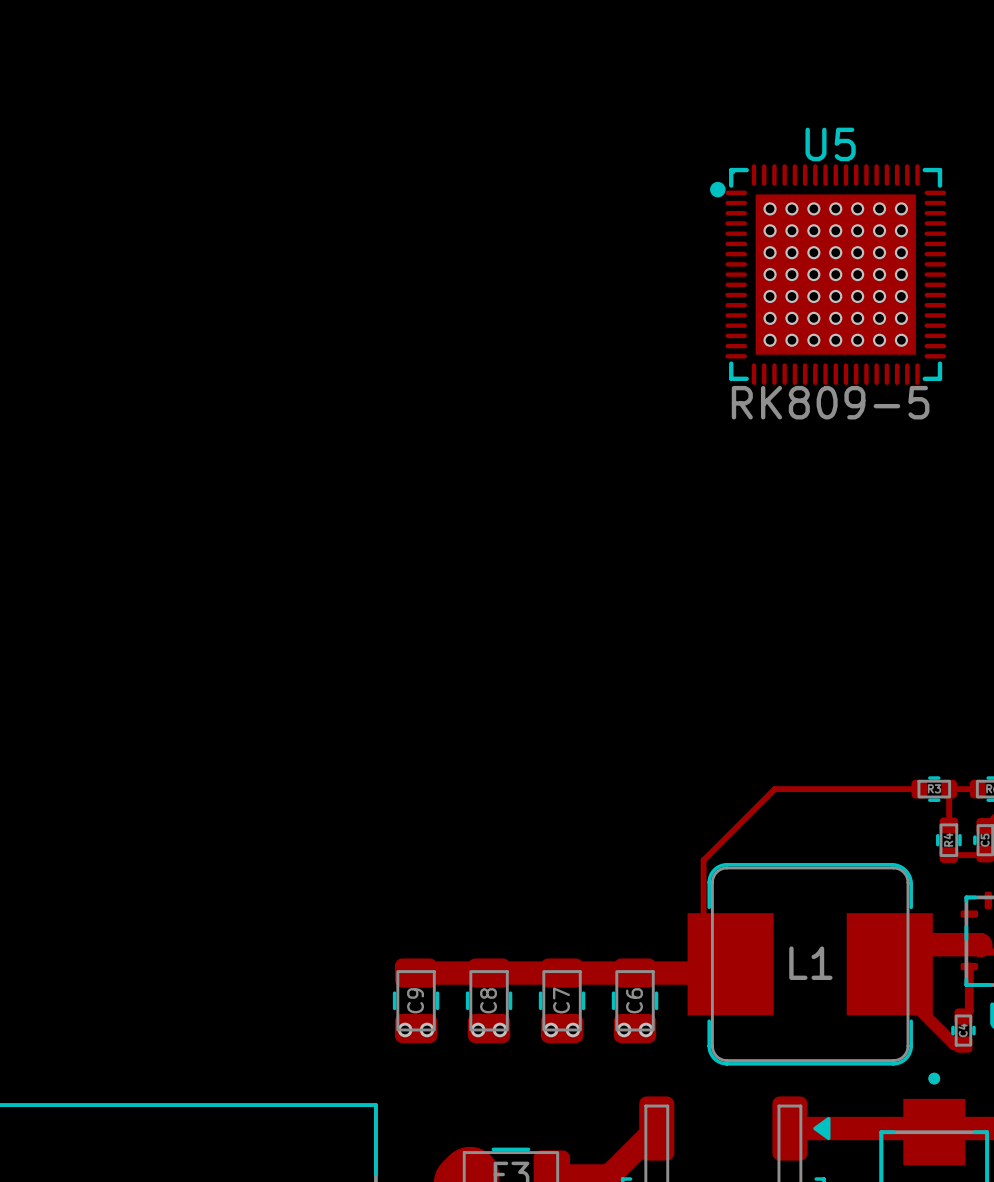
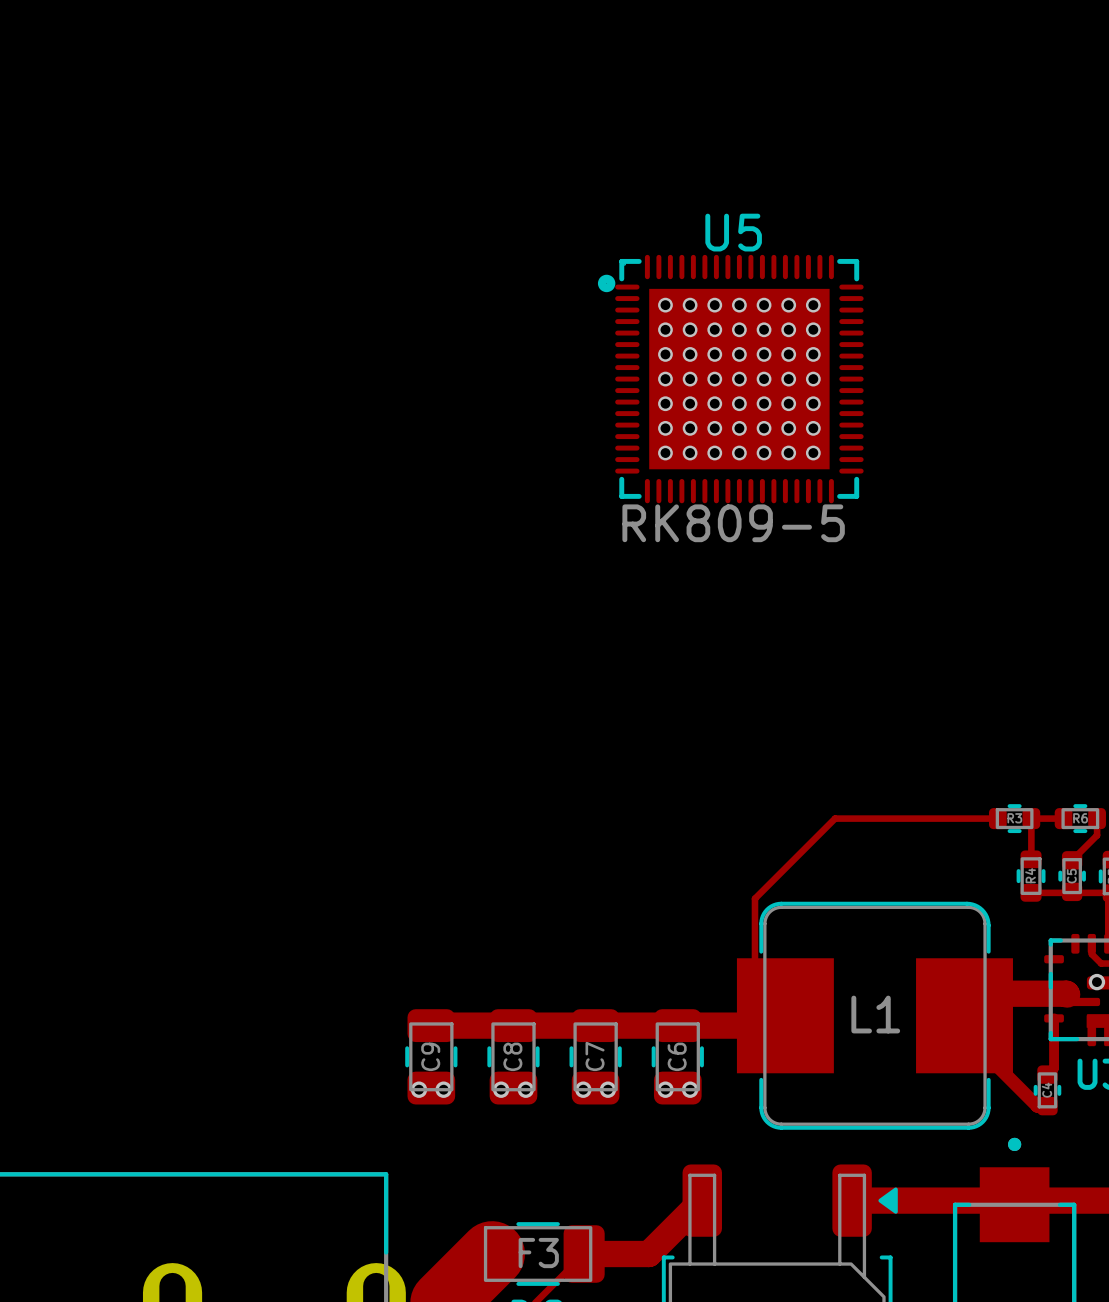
via: (770, 208) -> none
via: (791, 208) -> none
via: (813, 208) -> none
via: (835, 208) -> none
via: (857, 208) -> none
via: (879, 208) -> none
via: (901, 208) -> none
via: (770, 230) -> none
via: (791, 230) -> none
via: (813, 230) -> none
via: (835, 230) -> none
via: (857, 230) -> none
via: (879, 230) -> none
via: (901, 230) -> none
via: (770, 252) -> none
via: (791, 252) -> none
via: (813, 252) -> none
via: (835, 252) -> none
via: (857, 252) -> none
via: (879, 252) -> none
via: (901, 252) -> none
via: (770, 274) -> none
via: (791, 274) -> none
via: (813, 274) -> none
U5 position: (828, 274) -> (730, 379)
via: (835, 274) -> none
via: (857, 274) -> none
via: (879, 274) -> none
via: (901, 274) -> none
via: (770, 296) -> none
via: (791, 296) -> none
via: (813, 296) -> none
via: (835, 296) -> none
via: (857, 296) -> none
via: (879, 296) -> none
via: (901, 296) -> none
via: (770, 318) -> none
via: (791, 318) -> none
via: (813, 318) -> none
via: (835, 318) -> none
via: (857, 318) -> none
via: (879, 318) -> none
via: (901, 318) -> none
via: none -> (665, 305)
via: none -> (690, 305)
via: none -> (714, 305)
via: none -> (739, 305)
via: none -> (764, 305)
via: none -> (788, 305)
via: none -> (813, 305)
via: (770, 340) -> none
via: (791, 340) -> none
via: (813, 340) -> none
via: (835, 340) -> none
via: (857, 340) -> none
via: (879, 340) -> none
via: (901, 340) -> none
via: none -> (665, 329)
via: none -> (690, 329)
via: none -> (714, 329)
via: none -> (739, 329)
via: none -> (764, 329)
via: none -> (788, 329)
via: none -> (813, 329)
via: none -> (665, 354)
via: none -> (690, 354)
via: none -> (714, 354)
via: none -> (739, 354)
via: none -> (764, 354)
via: none -> (788, 354)
via: none -> (813, 354)
via: none -> (665, 379)
via: none -> (690, 379)
via: none -> (714, 379)
via: none -> (739, 379)
via: none -> (764, 379)
via: none -> (788, 379)
via: none -> (813, 379)
via: none -> (665, 403)
via: none -> (690, 403)
via: none -> (714, 403)
via: none -> (739, 403)
via: none -> (764, 403)
via: none -> (788, 403)
via: none -> (813, 403)
via: none -> (665, 428)
via: none -> (690, 428)
via: none -> (714, 428)
via: none -> (739, 428)
via: none -> (764, 428)
via: none -> (788, 428)
via: none -> (813, 428)
via: none -> (665, 453)
via: none -> (690, 453)
via: none -> (714, 453)
via: none -> (739, 453)
via: none -> (764, 453)
via: none -> (788, 453)
via: none -> (813, 453)

